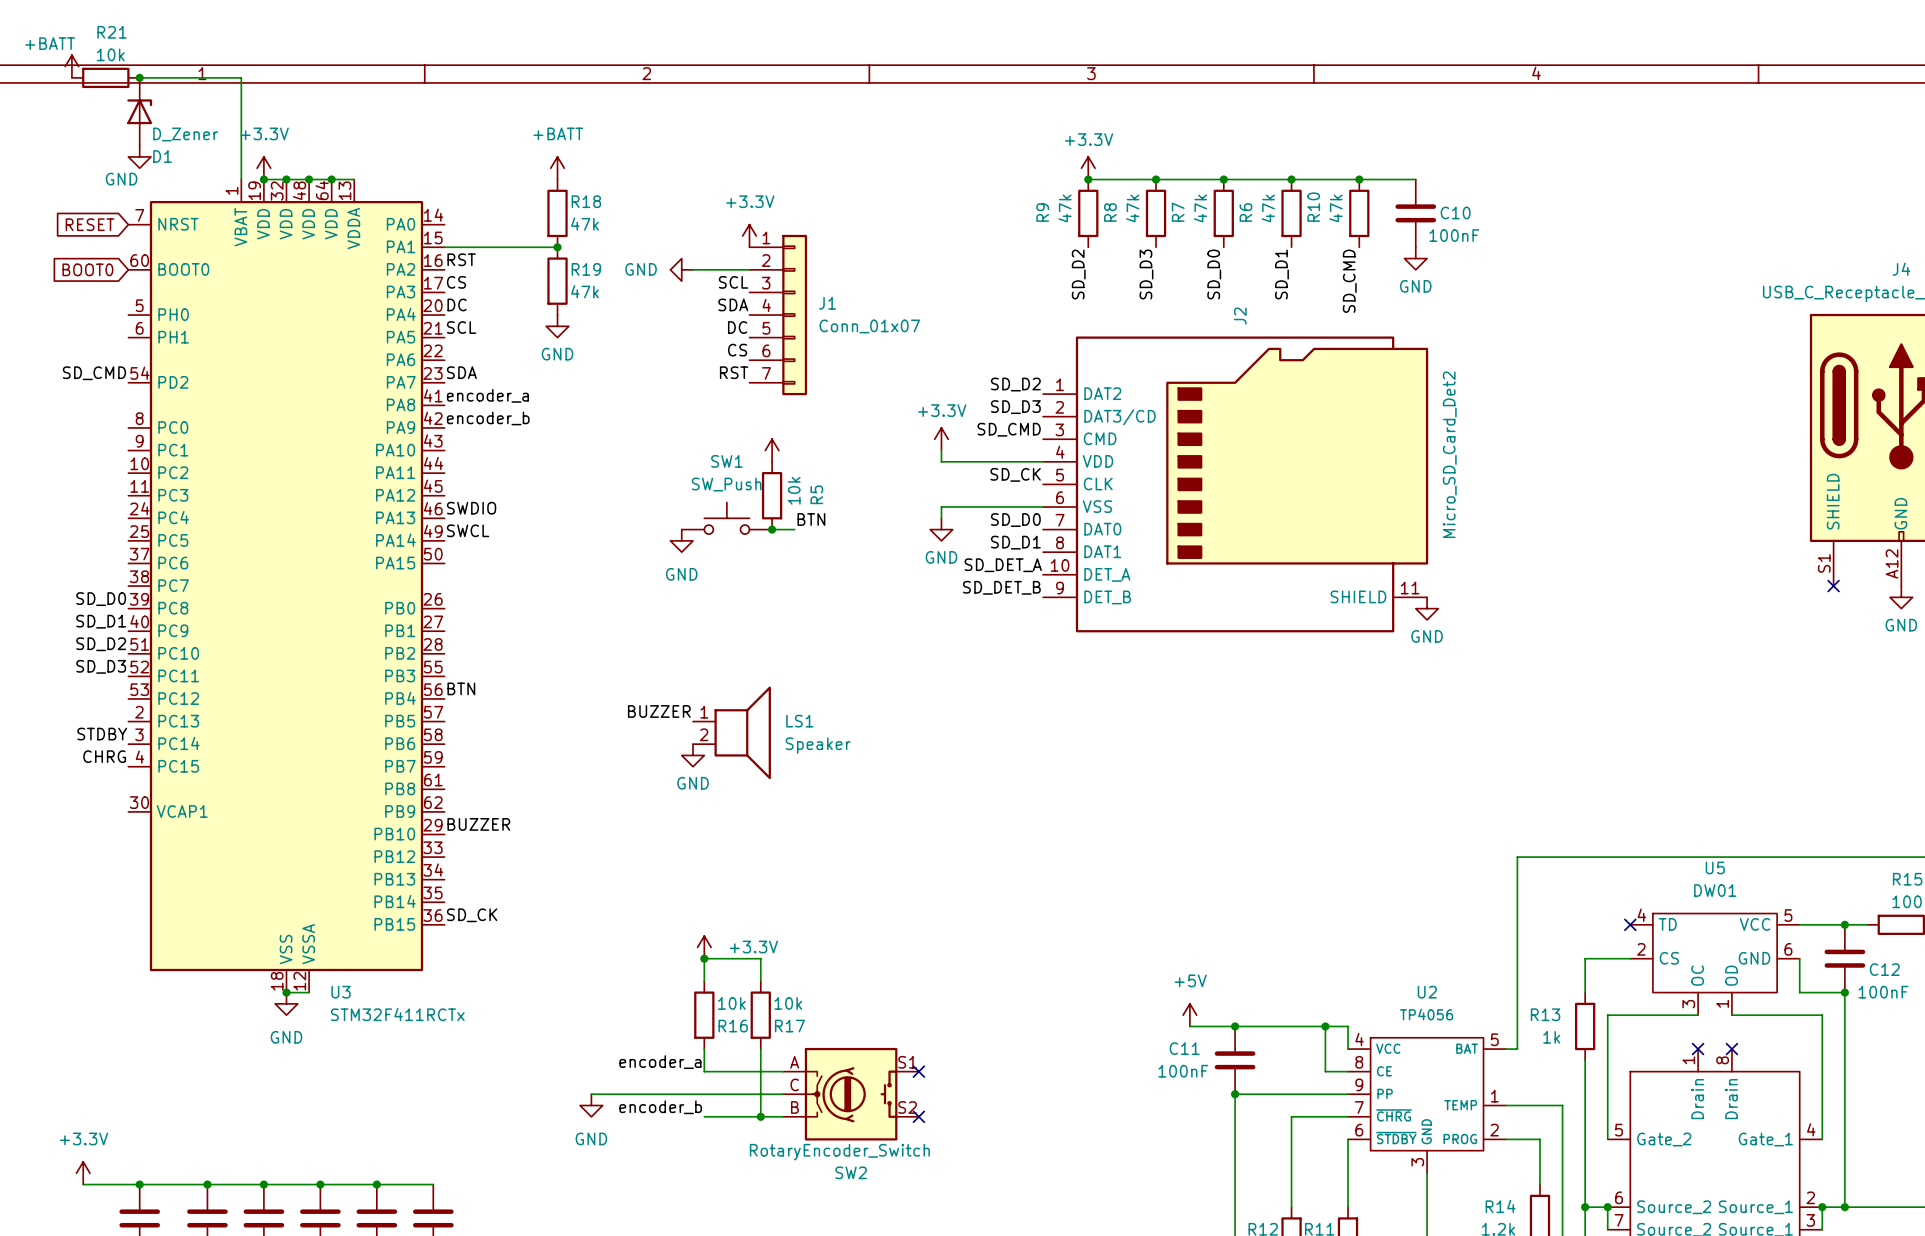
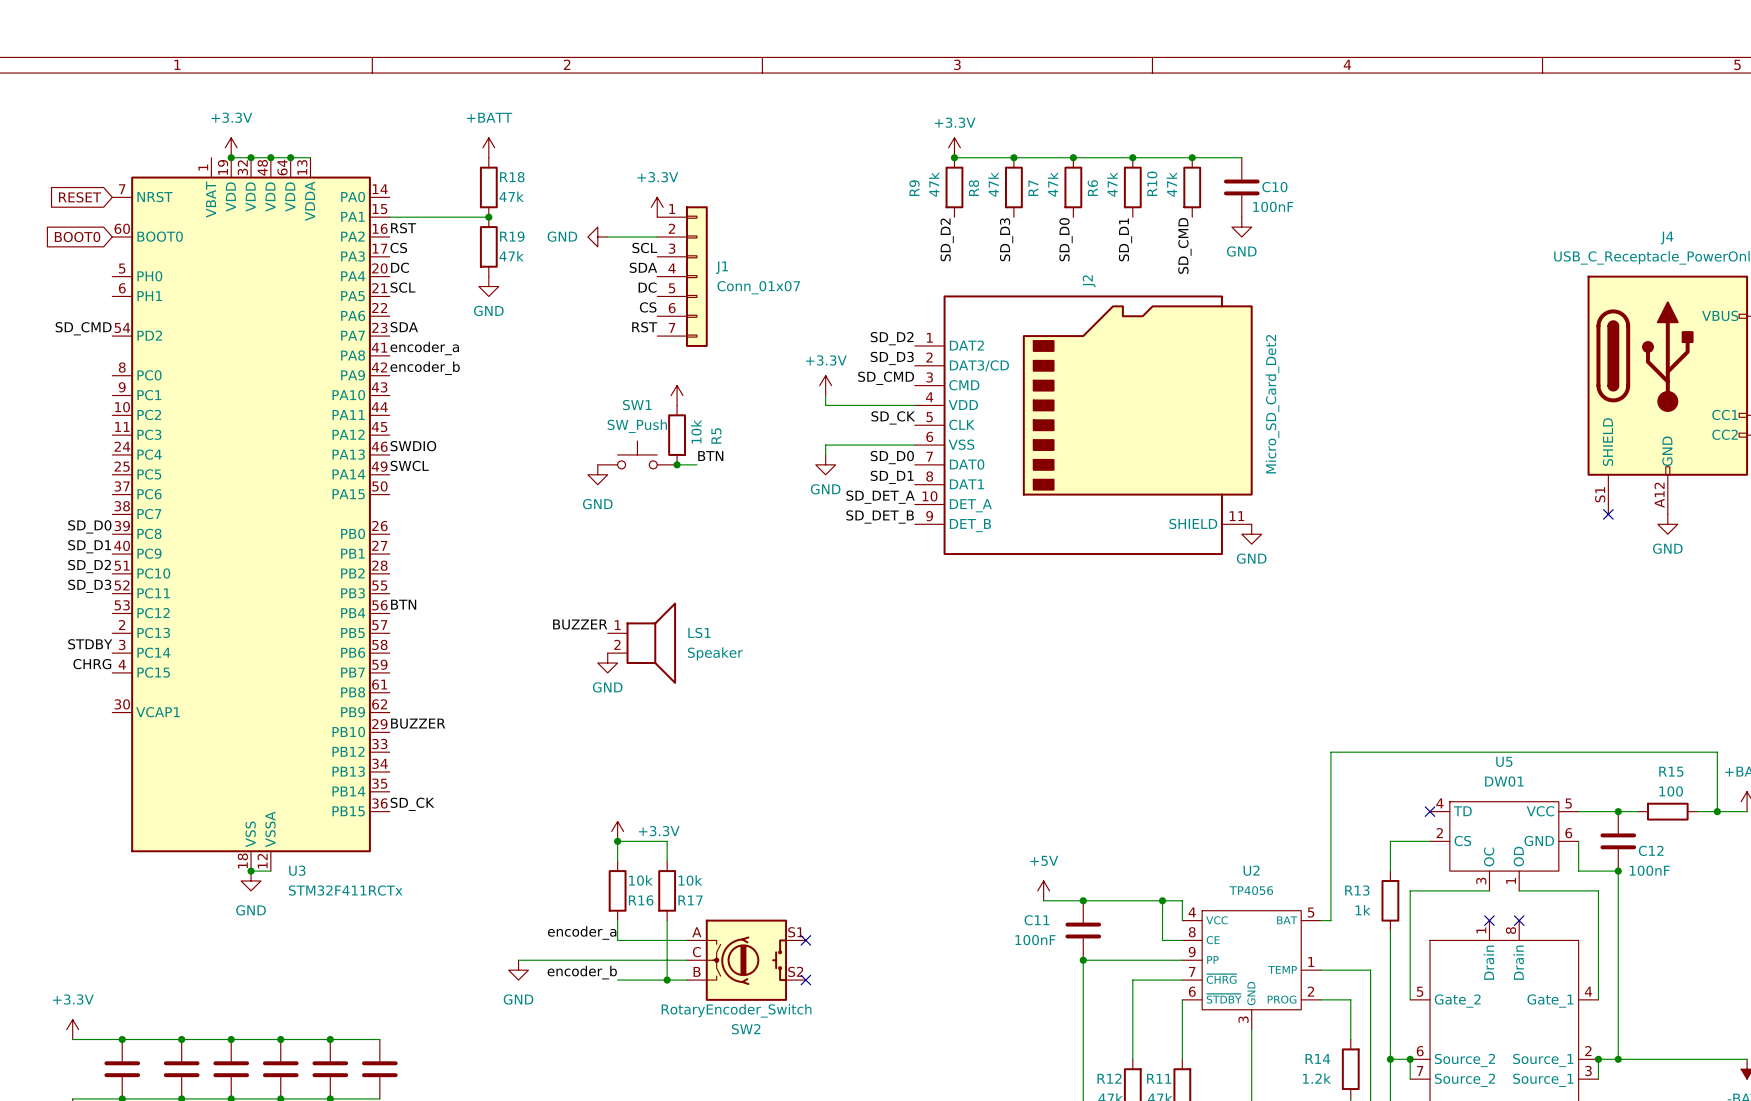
power symbol: +BATT (71, 66) -> none
R21: 10k (105, 77) -> none
wire: (139, 77) (241, 77) (241, 179) -> none
junction: (139, 77) -> none
D1: D_Zener (139, 111) -> none
power symbol: GND (139, 156) -> none

